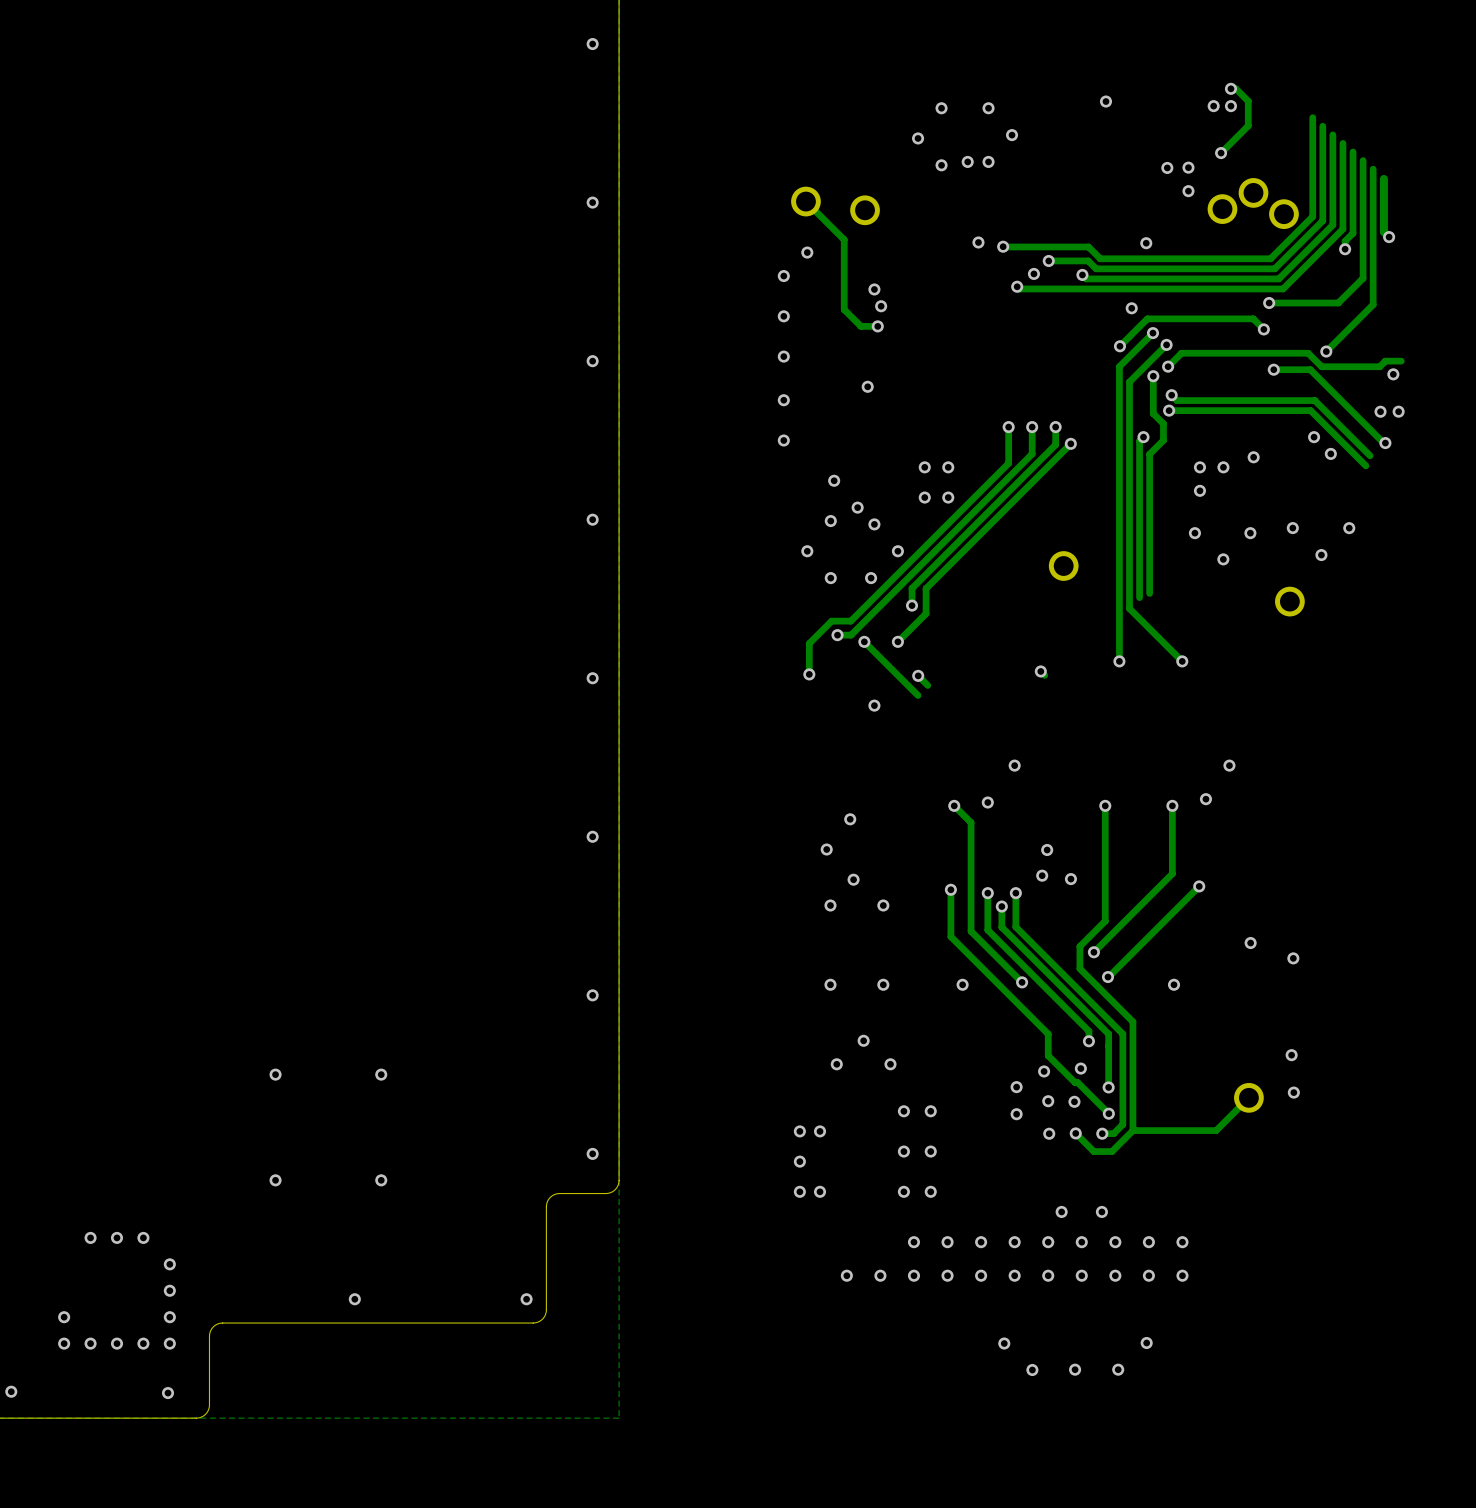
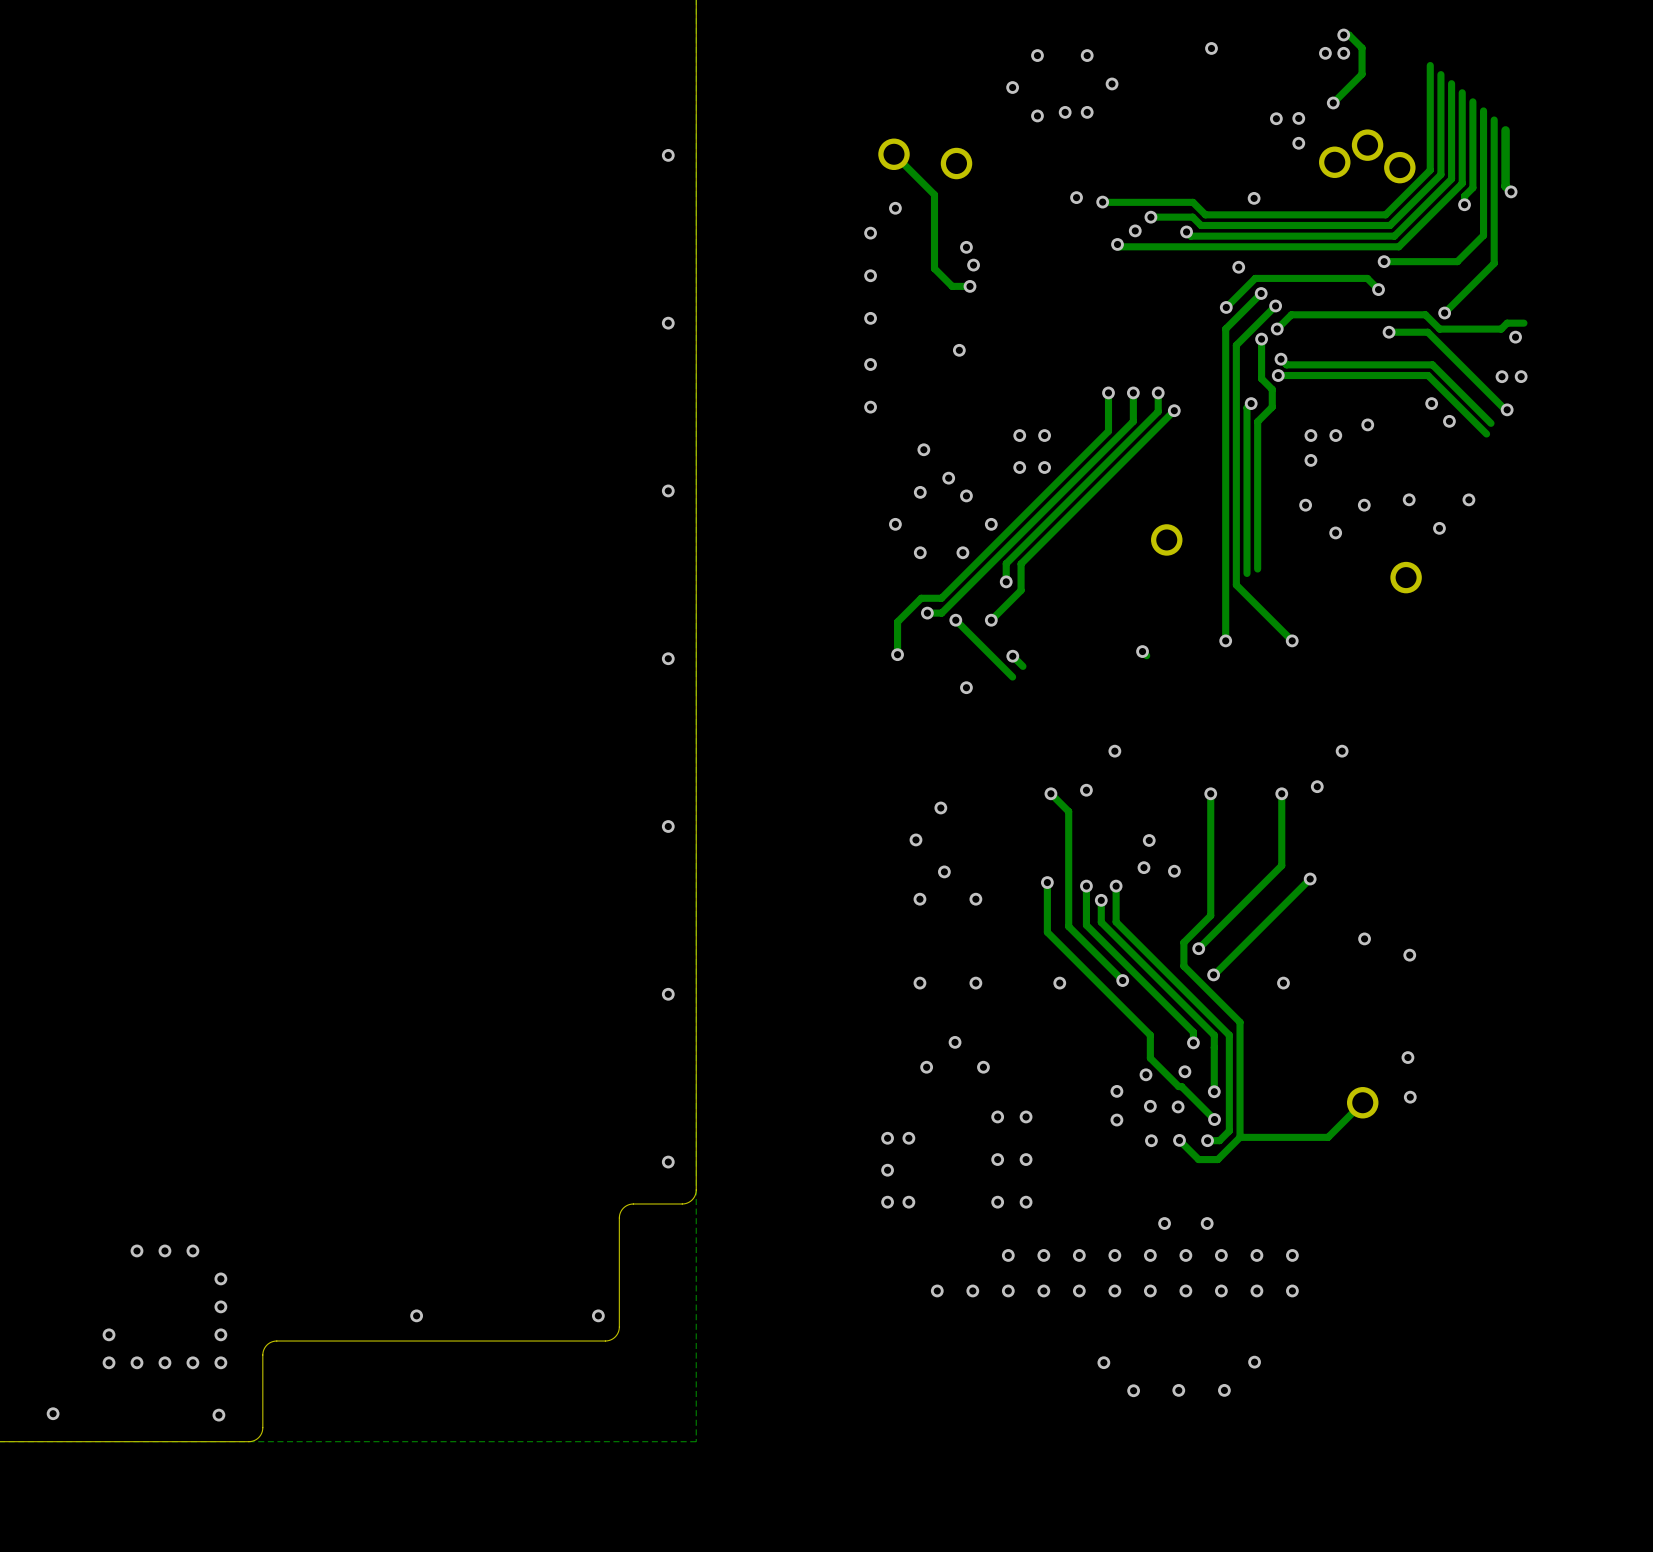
via: (275, 1074) -> none
via: (381, 1074) -> none
via: (275, 1180) -> none
via: (381, 1180) -> none

